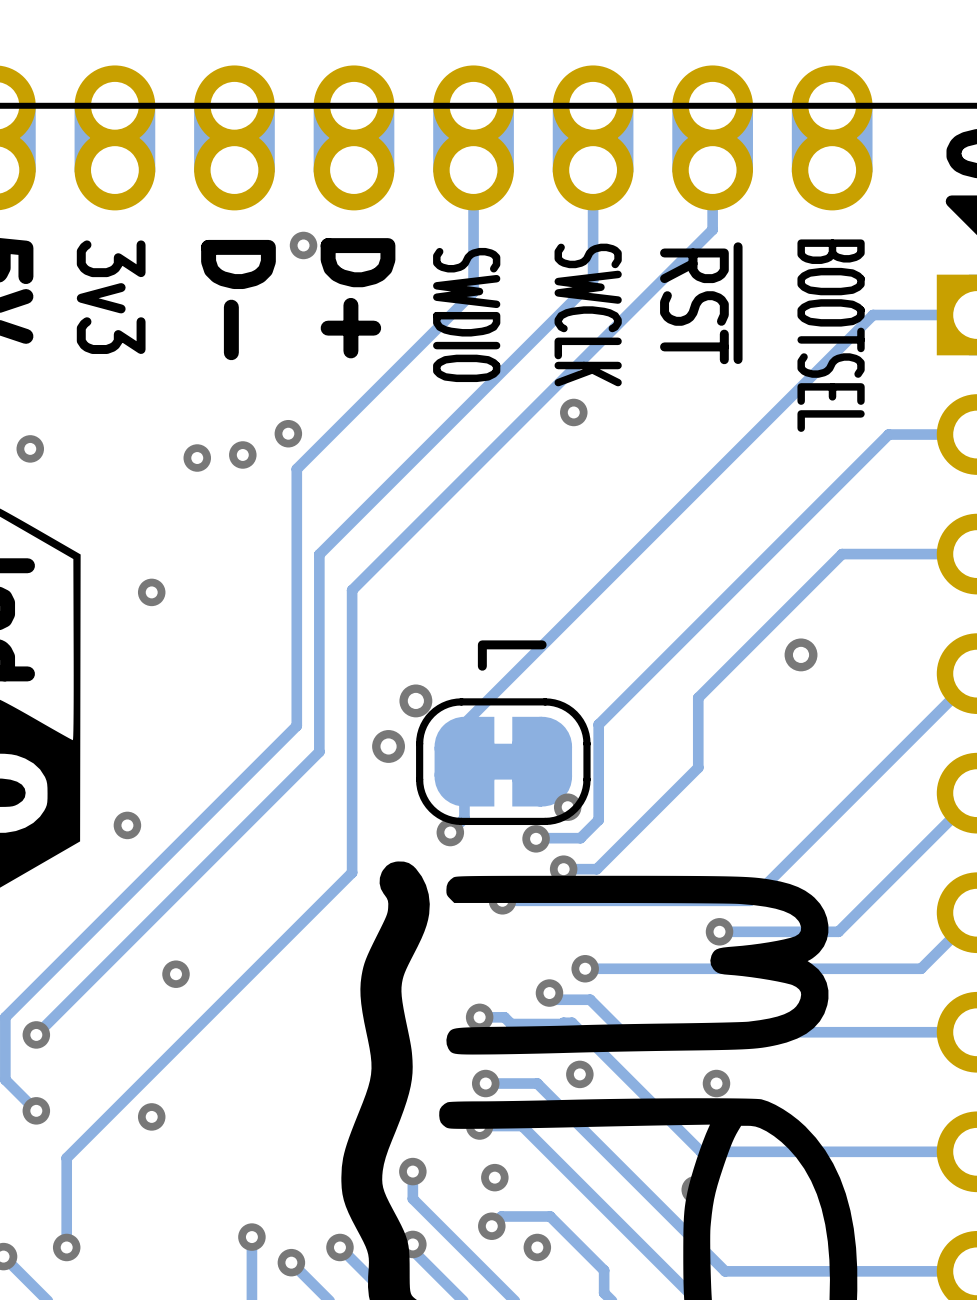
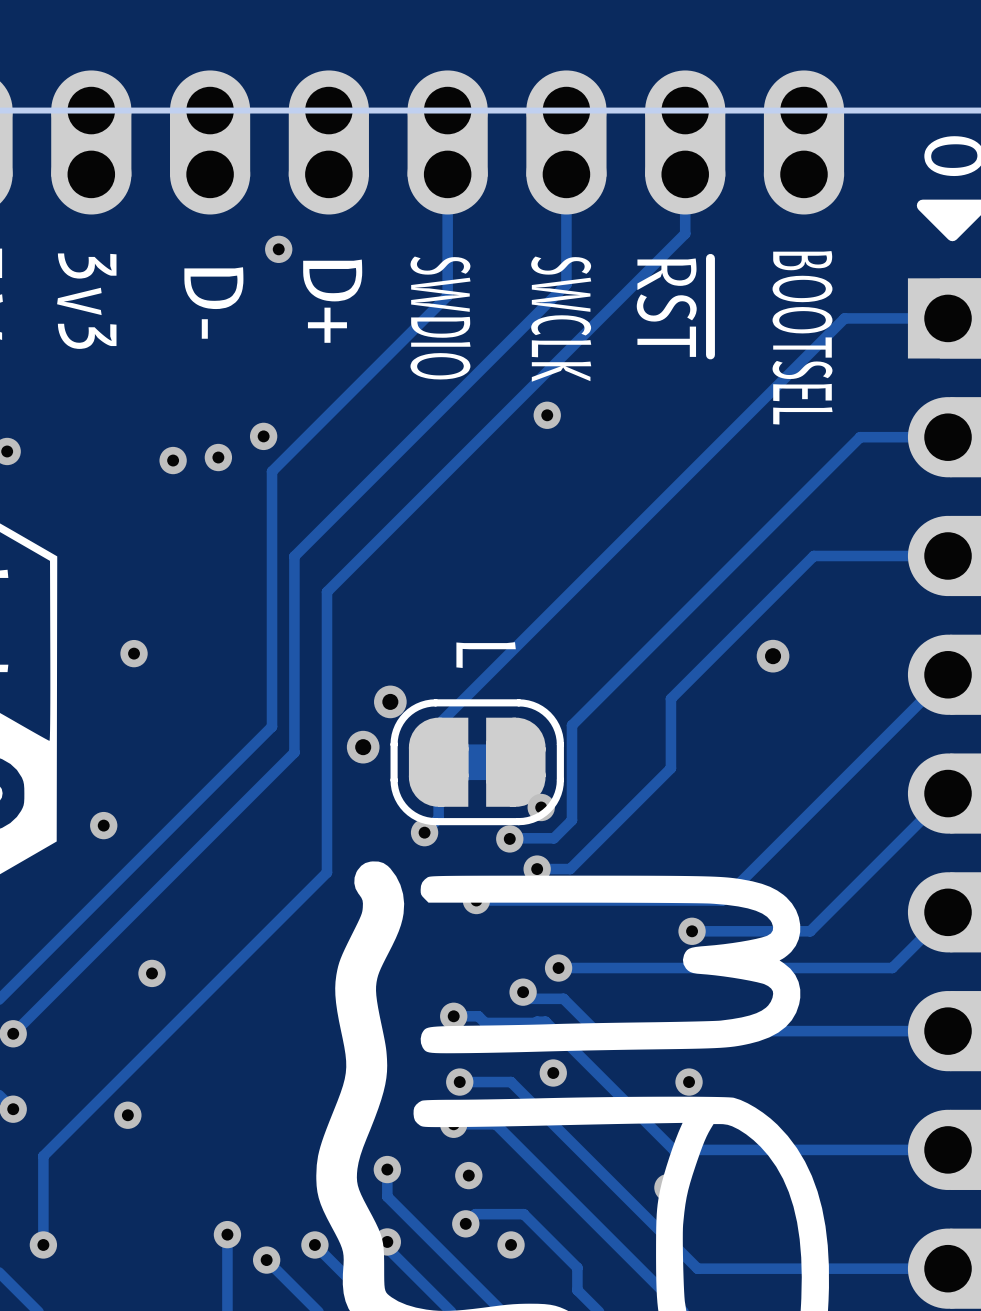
via position: (151, 592) -> (134, 653)

